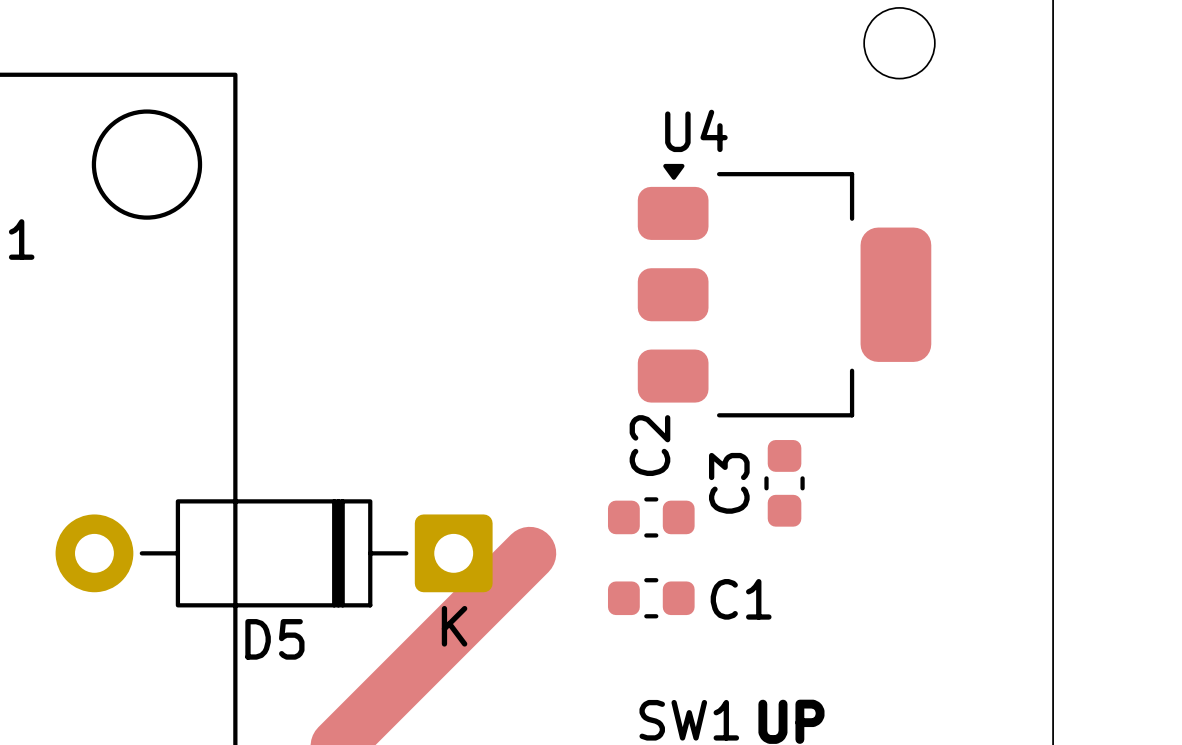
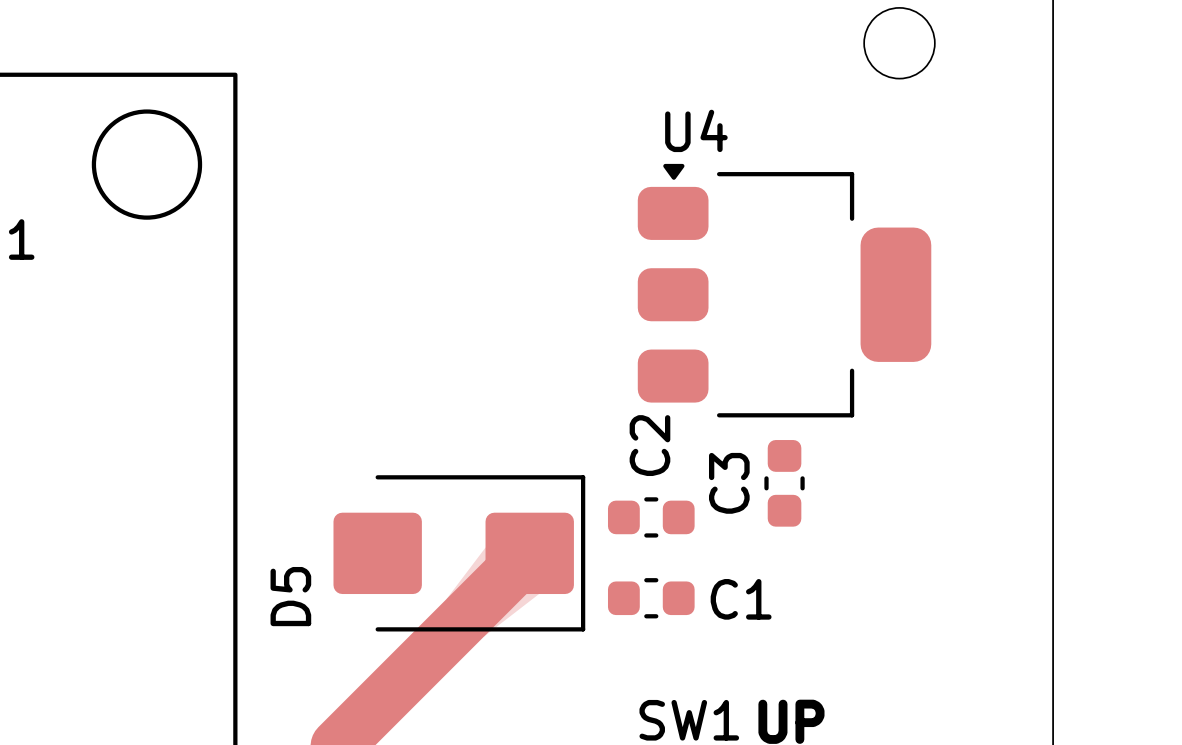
D5 footprint: [55, 499, 493, 608] -> [333, 475, 586, 632]
D5 name position: D5 (274, 639) -> D5 (290, 596)

